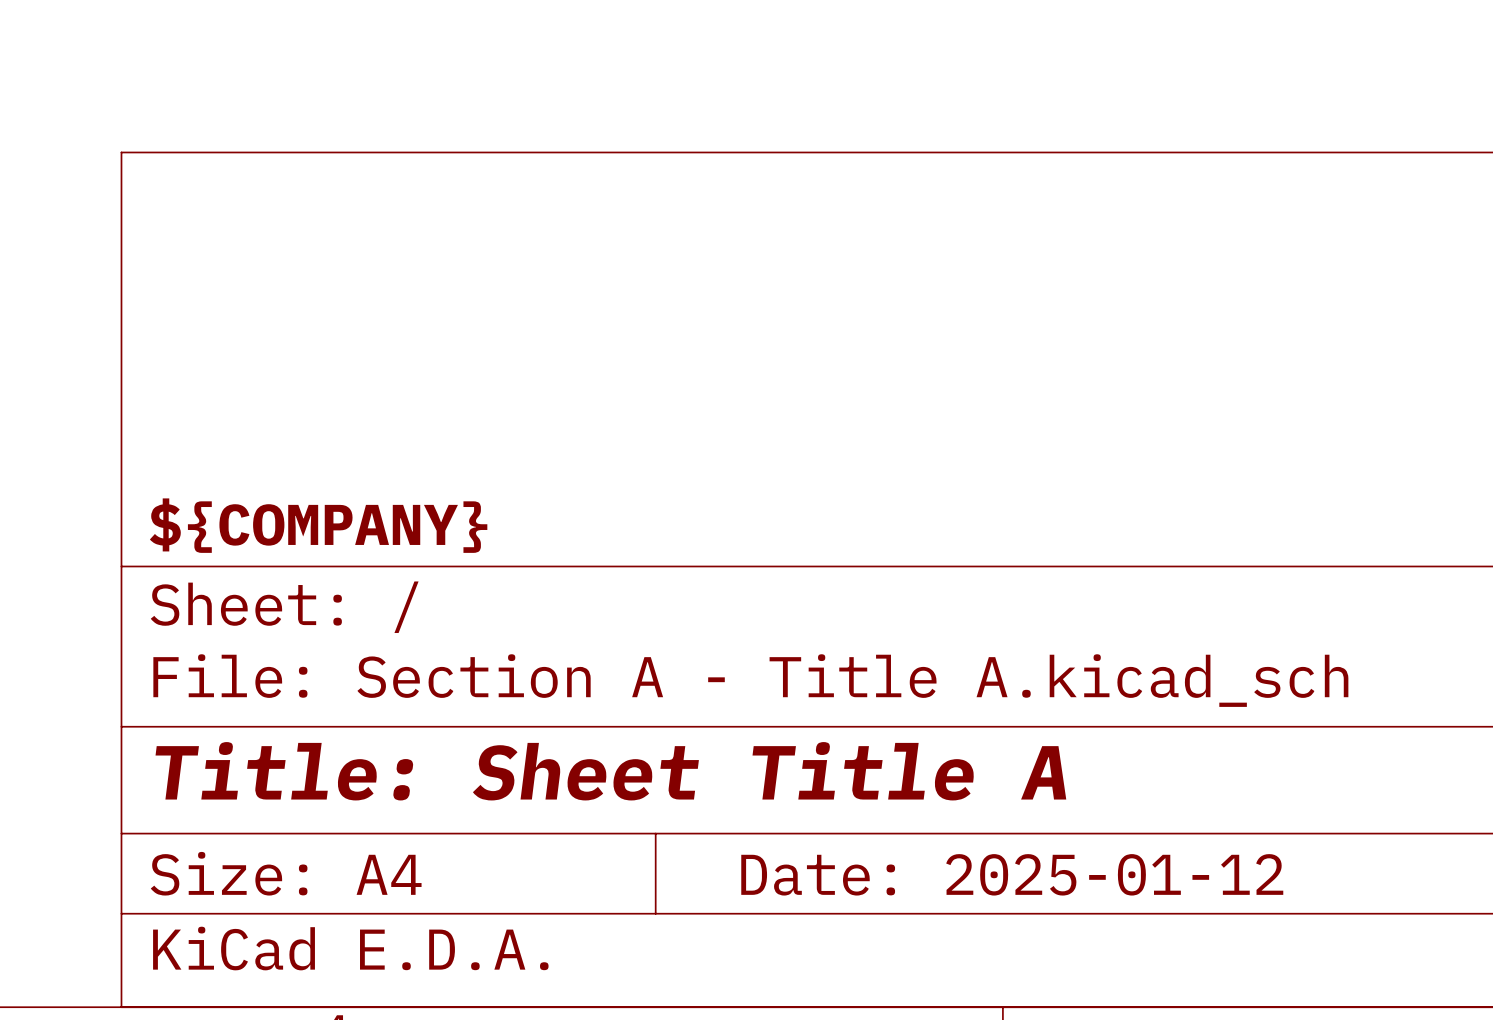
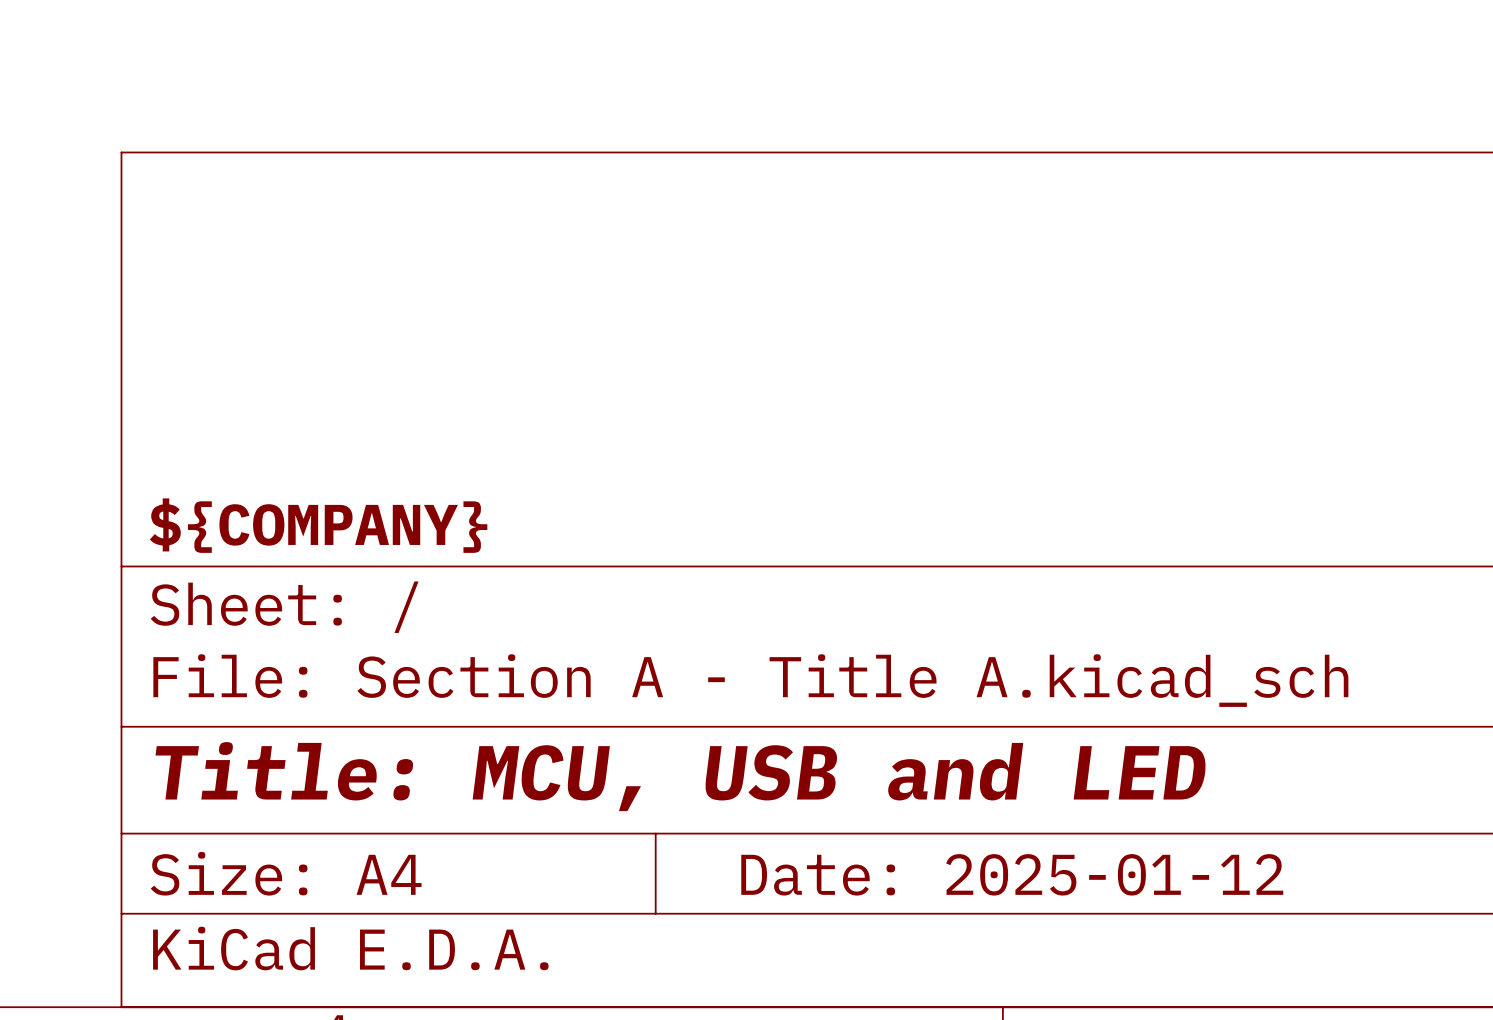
title block: Title: Sheet Title A (610, 771) -> Title: MCU, USB and LED (681, 776)

